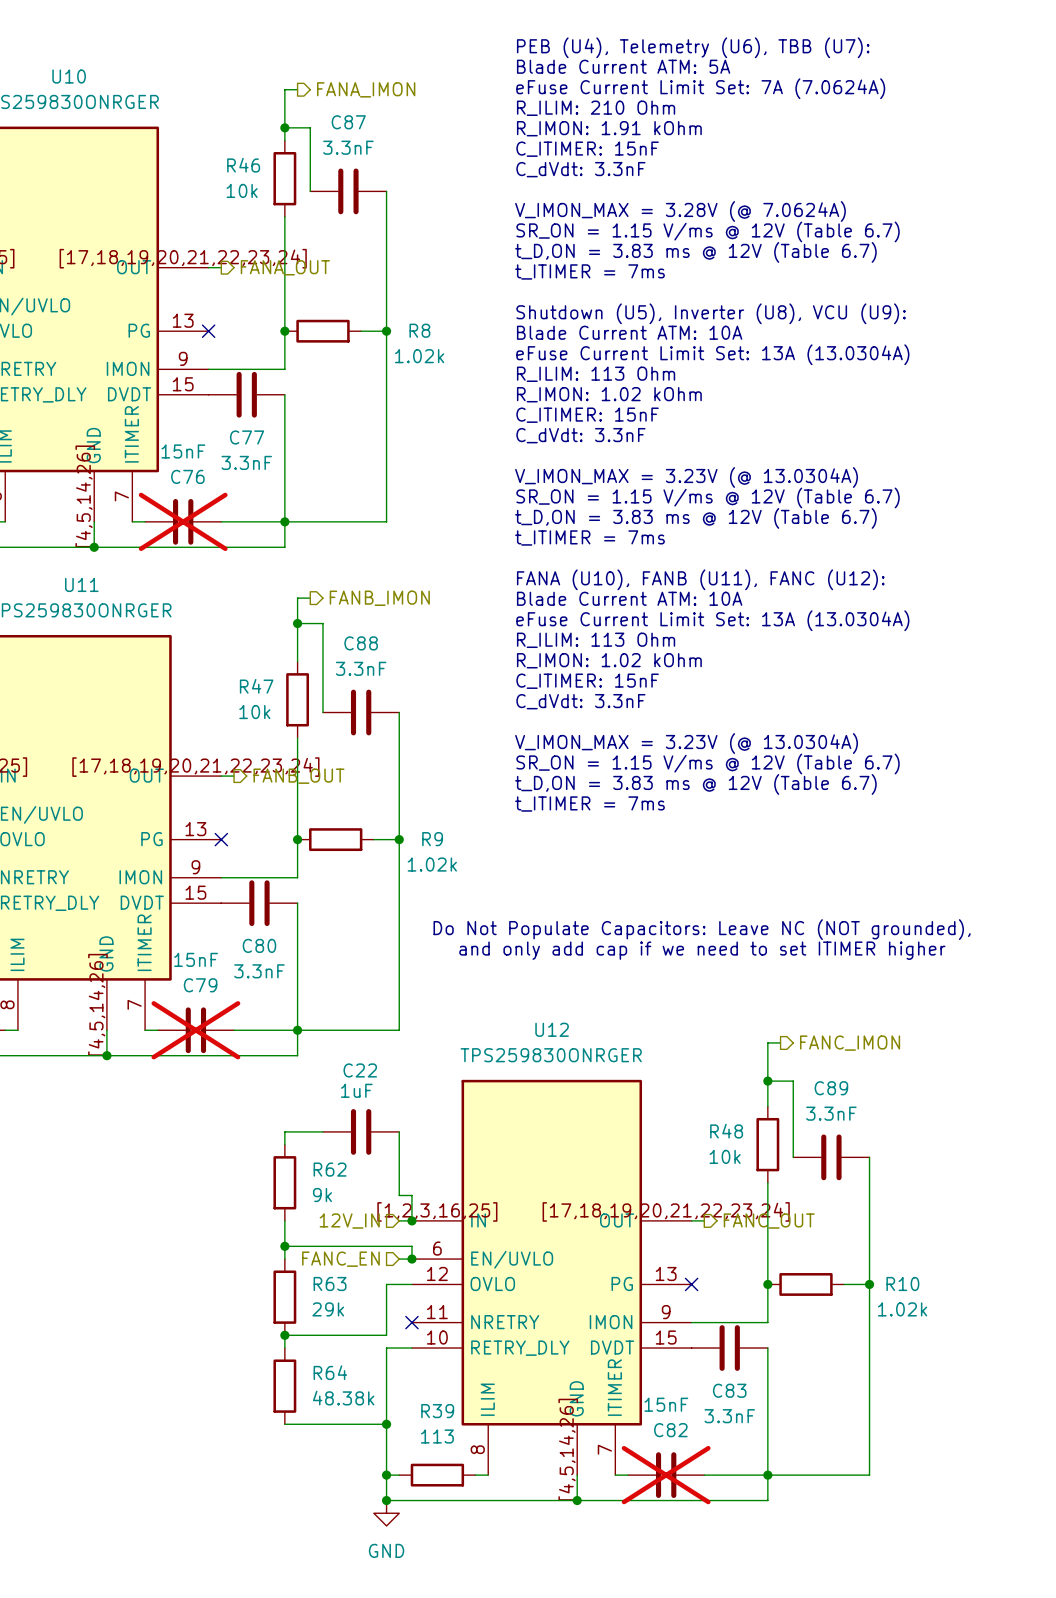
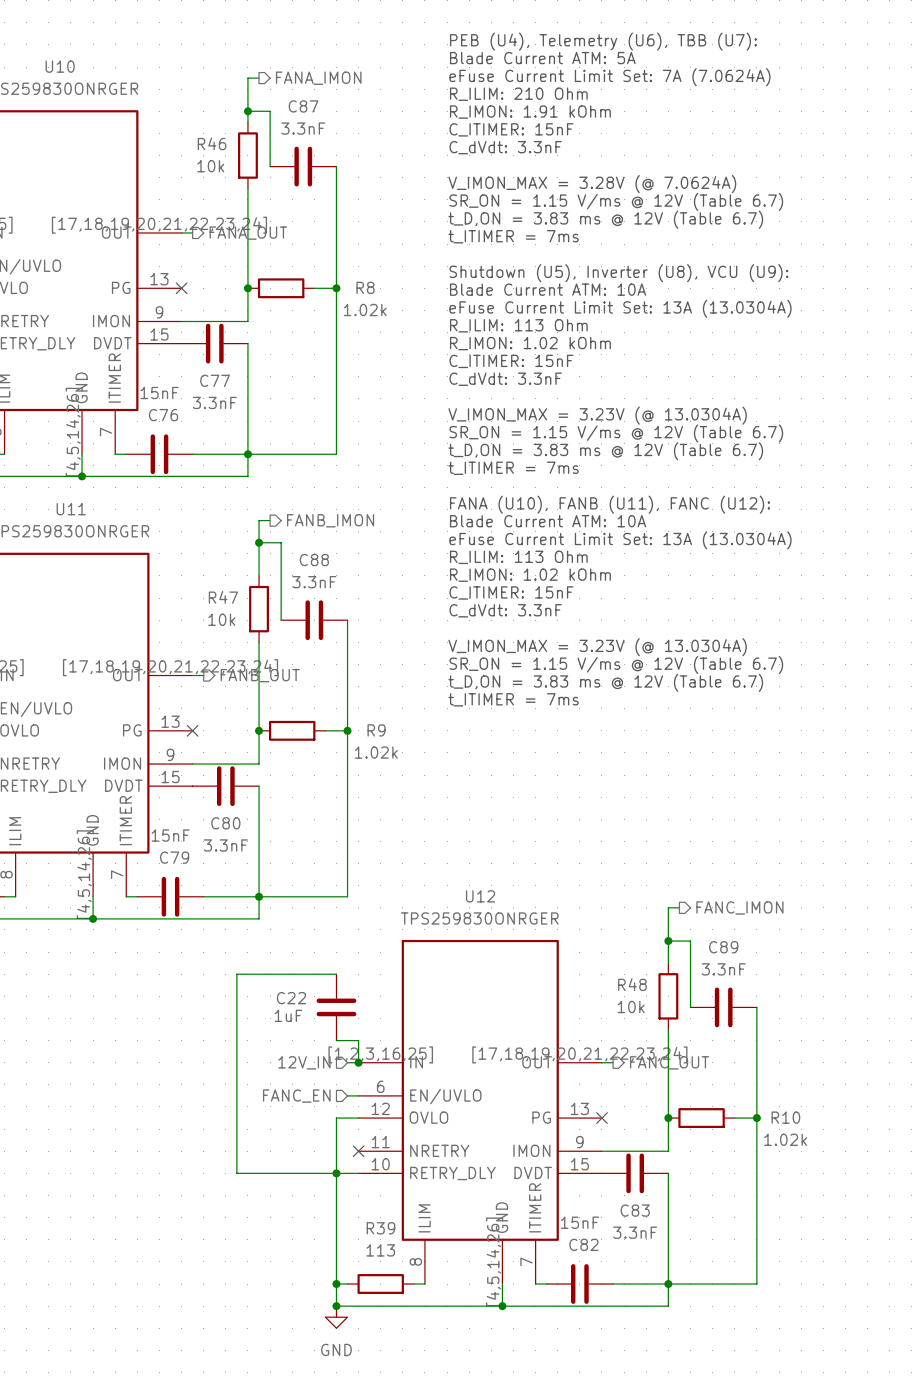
C76 do-not-place cross: (183, 521) -> none
text: Do Not Populate Capacitors: Leave NC (NOT grounded), (702, 929) -> none
text: and only add cap if we need to set ITIMER higher (702, 950) -> none
C79 do-not-place cross: (195, 1030) -> none
C22 name position: C22 (360, 1070) -> C22 (291, 998)
C22 value position: 1uF (356, 1090) -> 1uF (288, 1015)
wire: (323, 1131) (284, 1131) (284, 1144) -> none
C22 rotation: 0° (361, 1131) -> 90° clockwise (336, 1007)
wire: (399, 1131) (399, 1195) -> (336, 1040) (347, 1040)
R62: 9k (284, 1182) -> none
wire: (284, 1220) (284, 1259) -> none
wire: (284, 1246) (411, 1246) (411, 1259) -> none
junction: (284, 1246) -> none
junction: (411, 1259) -> none
R63: 29k (284, 1297) -> none
junction: (284, 1335) -> none
wire: (386, 1335) (284, 1335) (284, 1348) -> (336, 1162) (336, 1173) (236, 1173) (236, 974) (336, 974)
junction: none -> (336, 1173)
R64: 48.38k (284, 1386) -> none
wire: (284, 1424) (386, 1424) -> none
junction: (386, 1424) -> none
C82 do-not-place cross: (666, 1475) -> none

